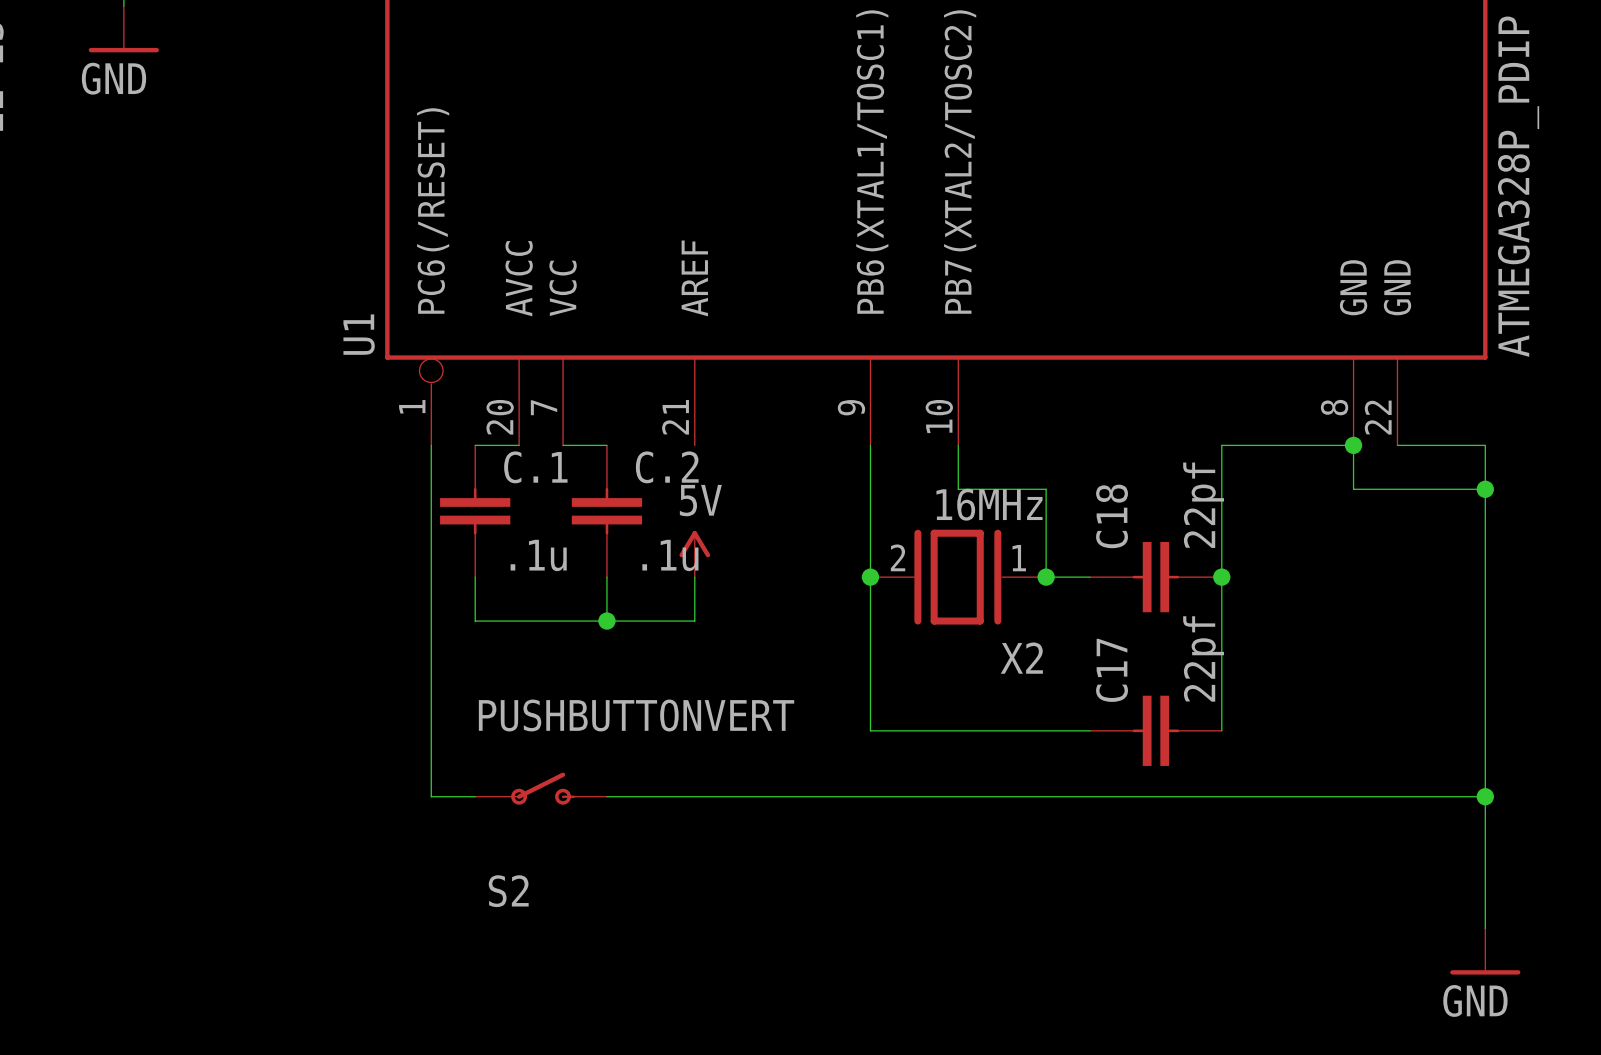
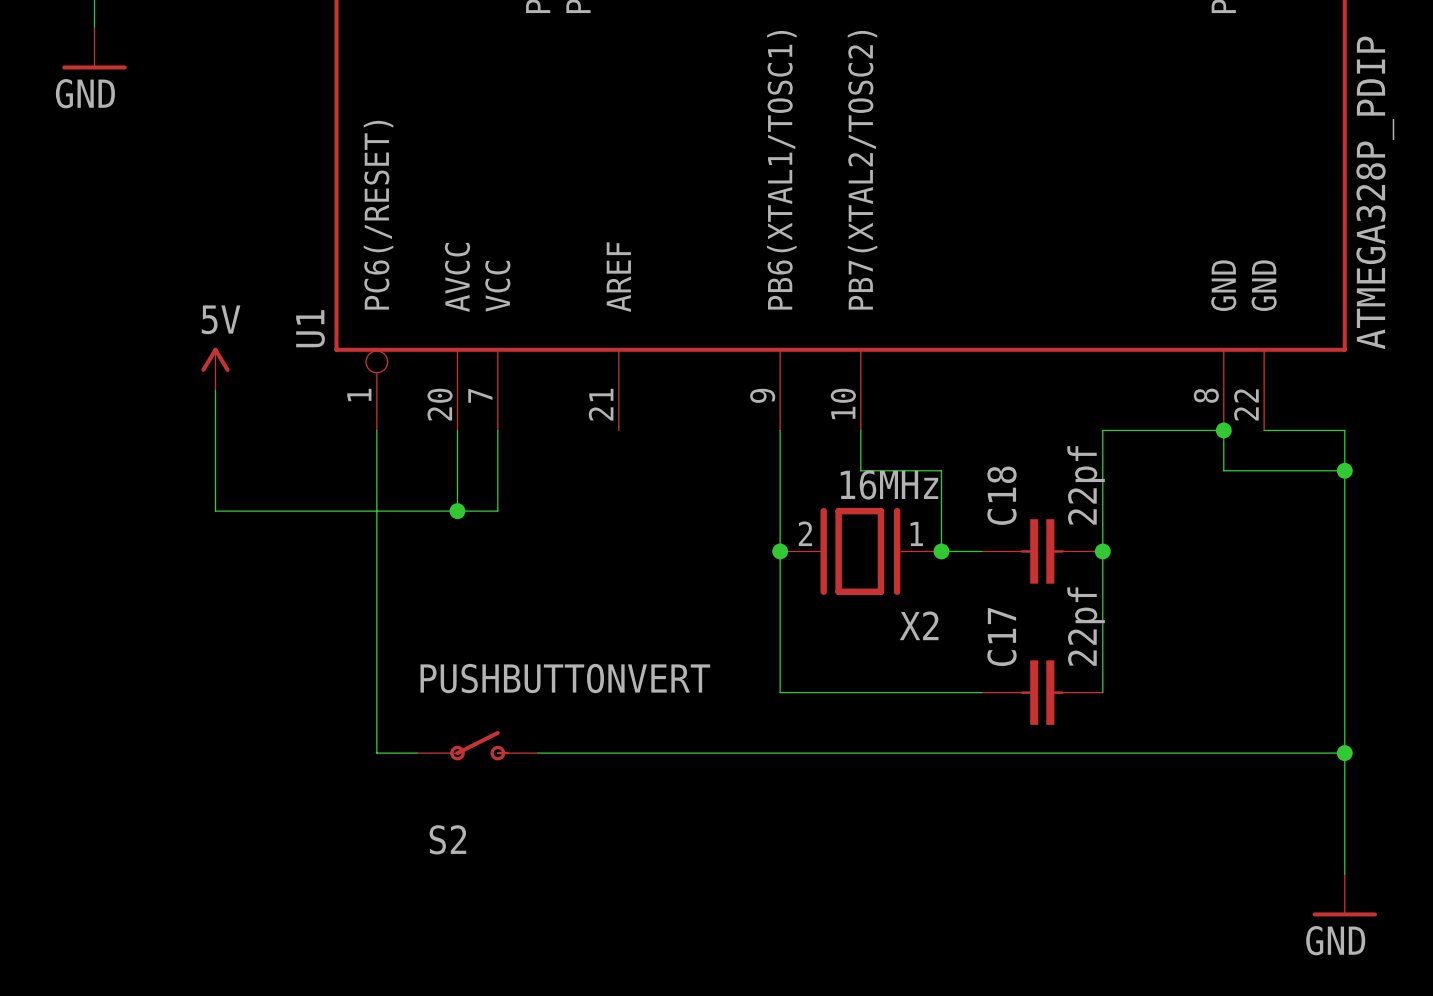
power symbol: none -> 5V (215, 368)
wire: (475, 445) (519, 445) -> (457, 511) (457, 430)
wire: (563, 445) (606, 445) -> (497, 430) (497, 511) (215, 511) (215, 390)
C.1: .1u (475, 511) -> none
C.2: .1u (606, 511) -> none
junction: none -> (457, 511)
power symbol: 5V (694, 554) -> none
wire: (475, 577) (475, 621) (694, 621) (694, 577) -> none
wire: (606, 577) (606, 621) -> none
junction: (606, 621) -> none

